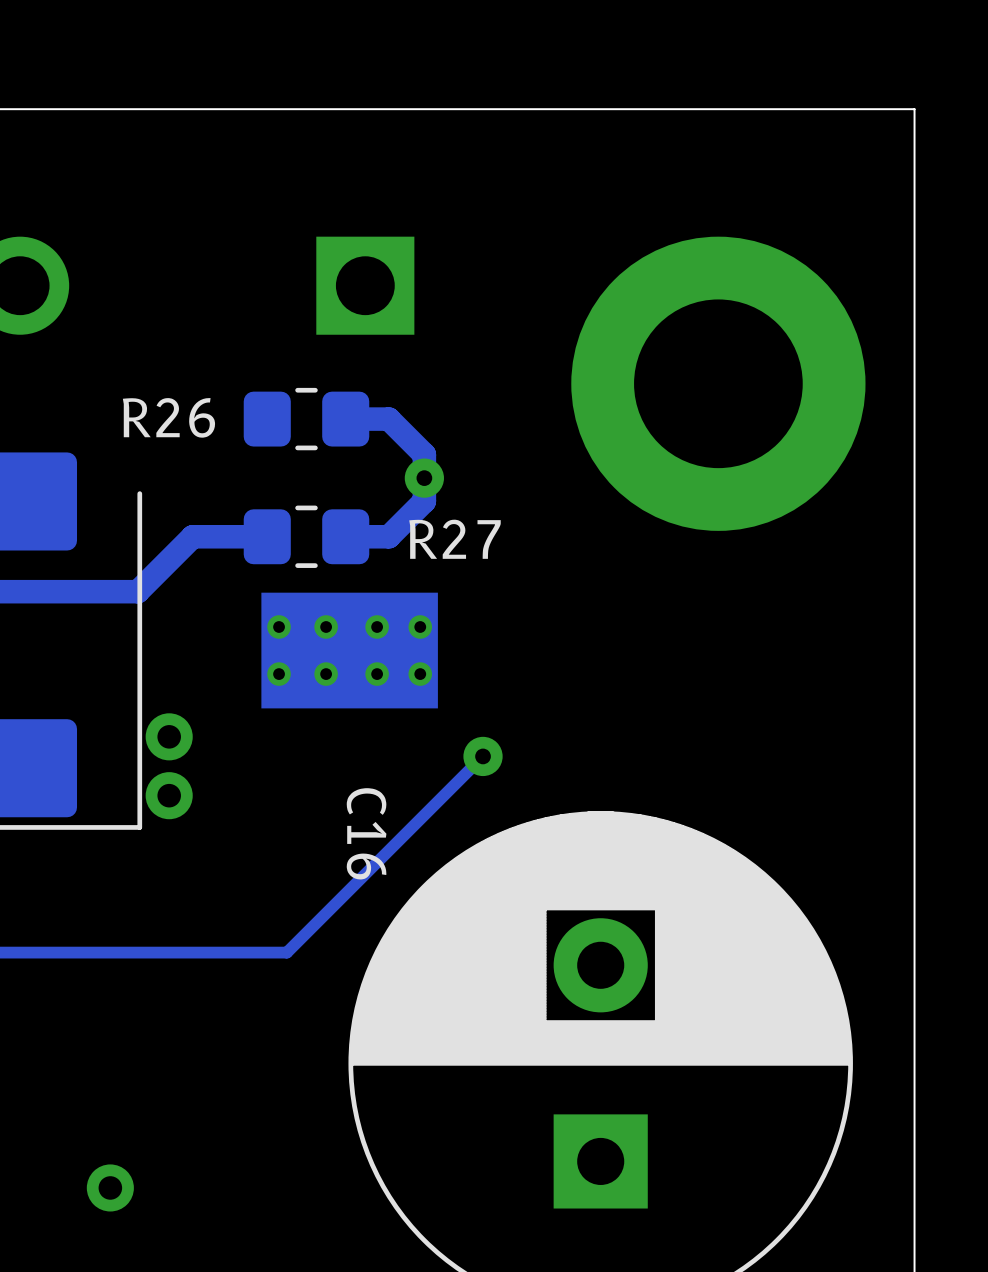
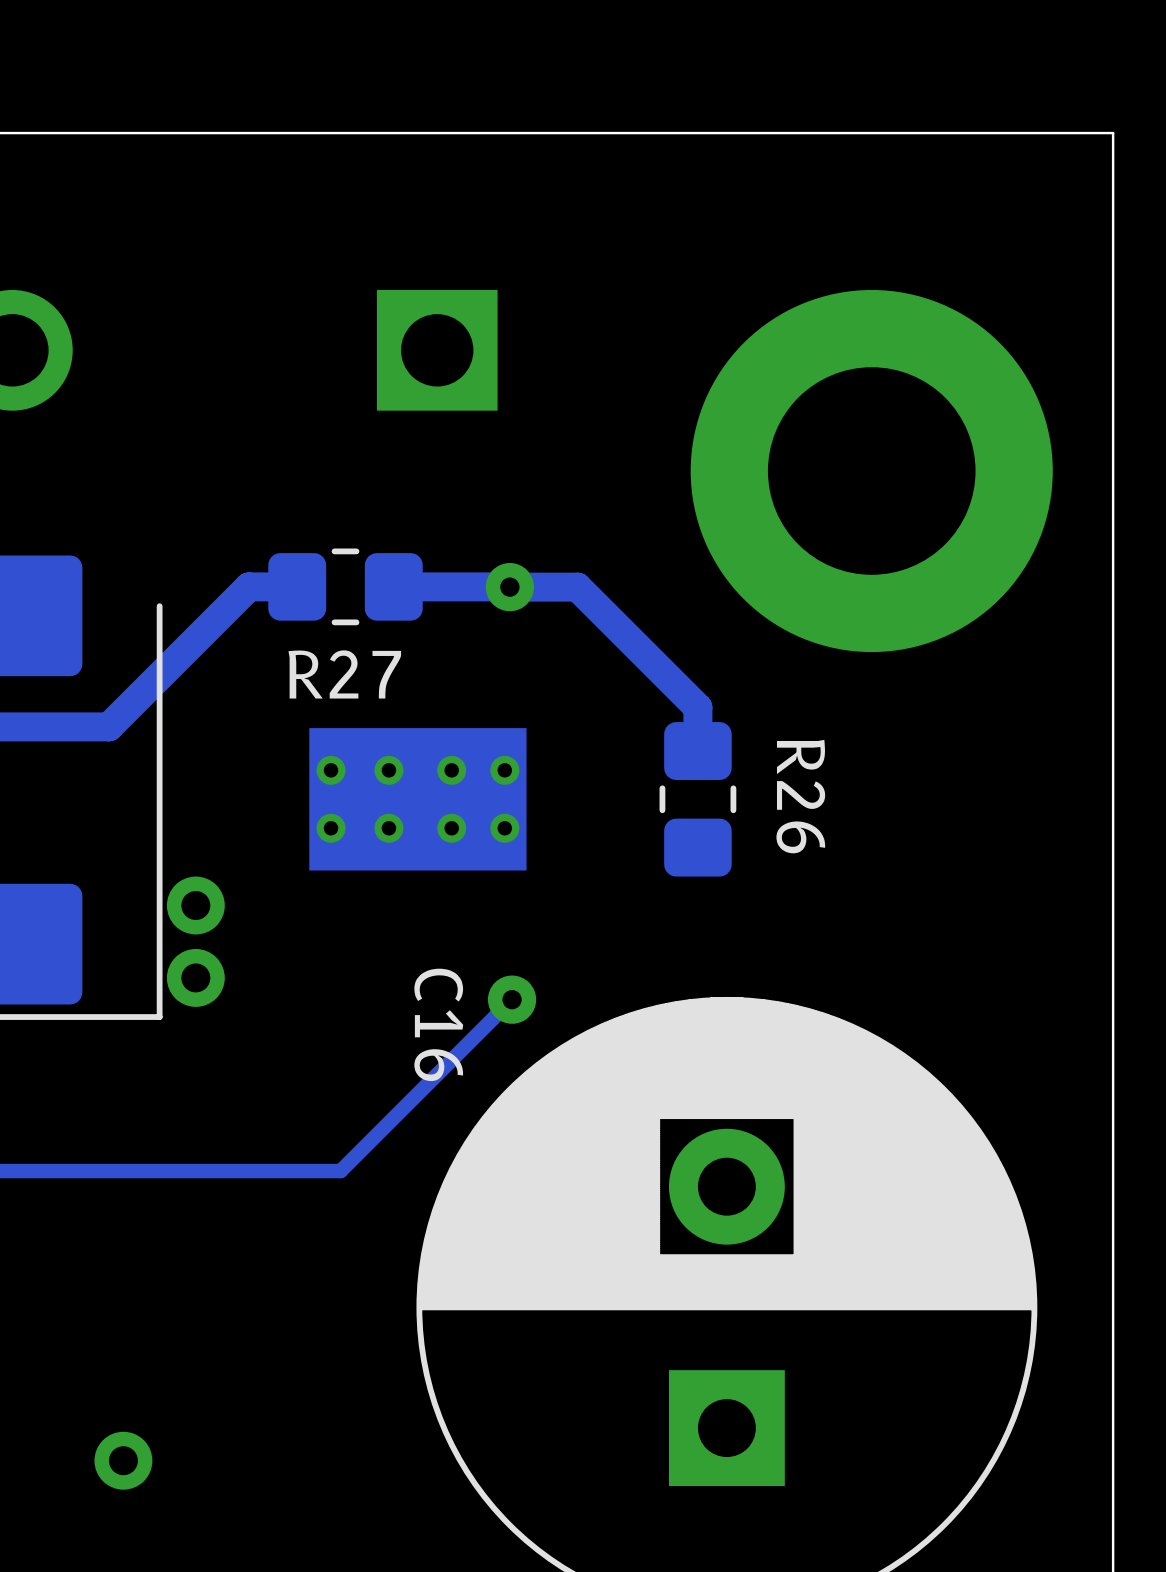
R26 name position: R26 (168, 417) -> R26 (800, 796)
R26 rotation: 0° (306, 419) -> 90° clockwise (697, 799)
R26 position: (306, 419) -> (697, 799)
track: (345, 419) (388, 419) (424, 454) (424, 501) (388, 536) (345, 536) -> none
track: none -> (509, 586) (393, 586)
track: none -> (509, 587) (577, 587) (697, 707) (697, 751)
track: (267, 536) (192, 536) (137, 591) (98, 591) -> (297, 586) (248, 586) (108, 726)
R27 position: (306, 536) -> (345, 586)
R27 name position: R27 (454, 539) -> R27 (344, 674)
track: (483, 756) (426, 813) -> none
via position: (483, 756) -> (512, 999)

